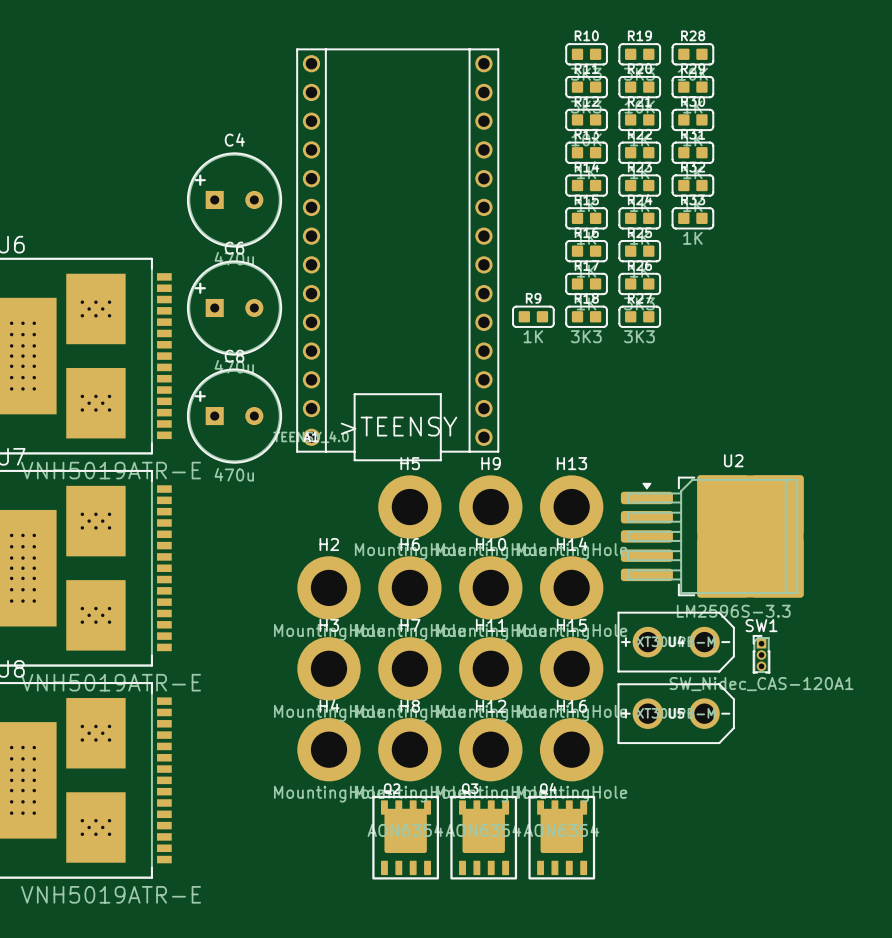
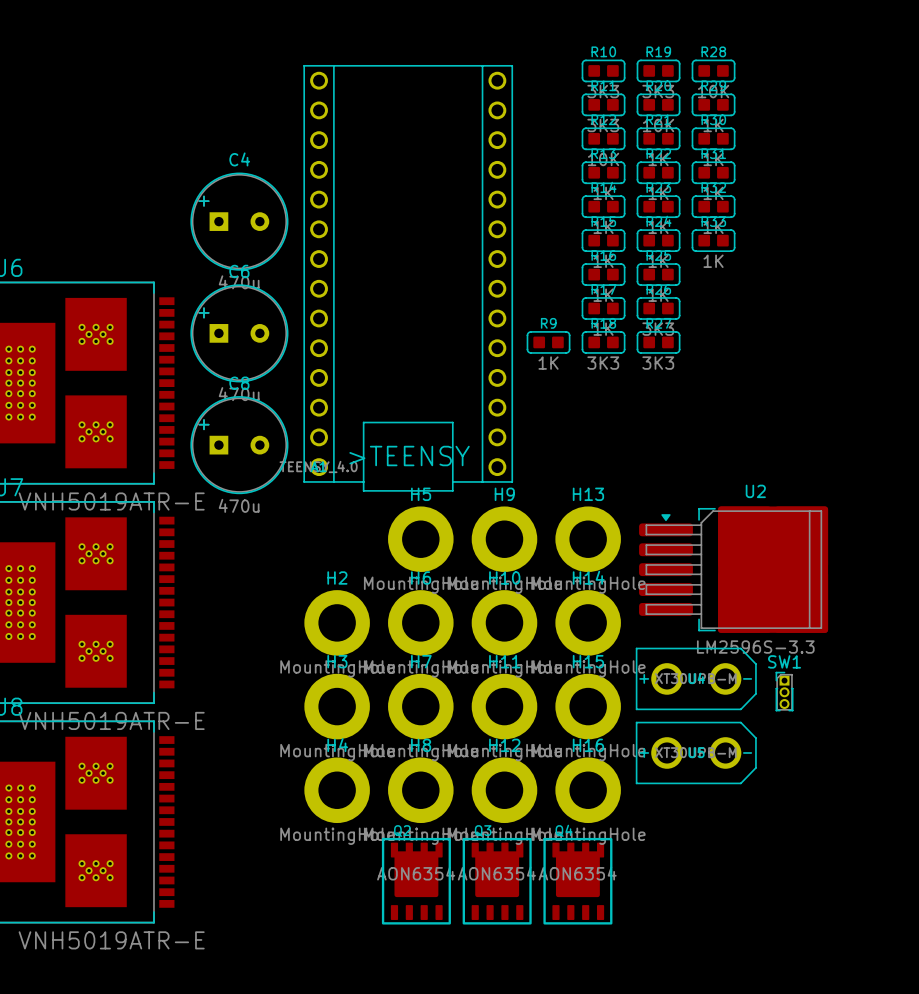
SW1 value: SW_Nidec_CAS-120A1 (761, 684) -> none

